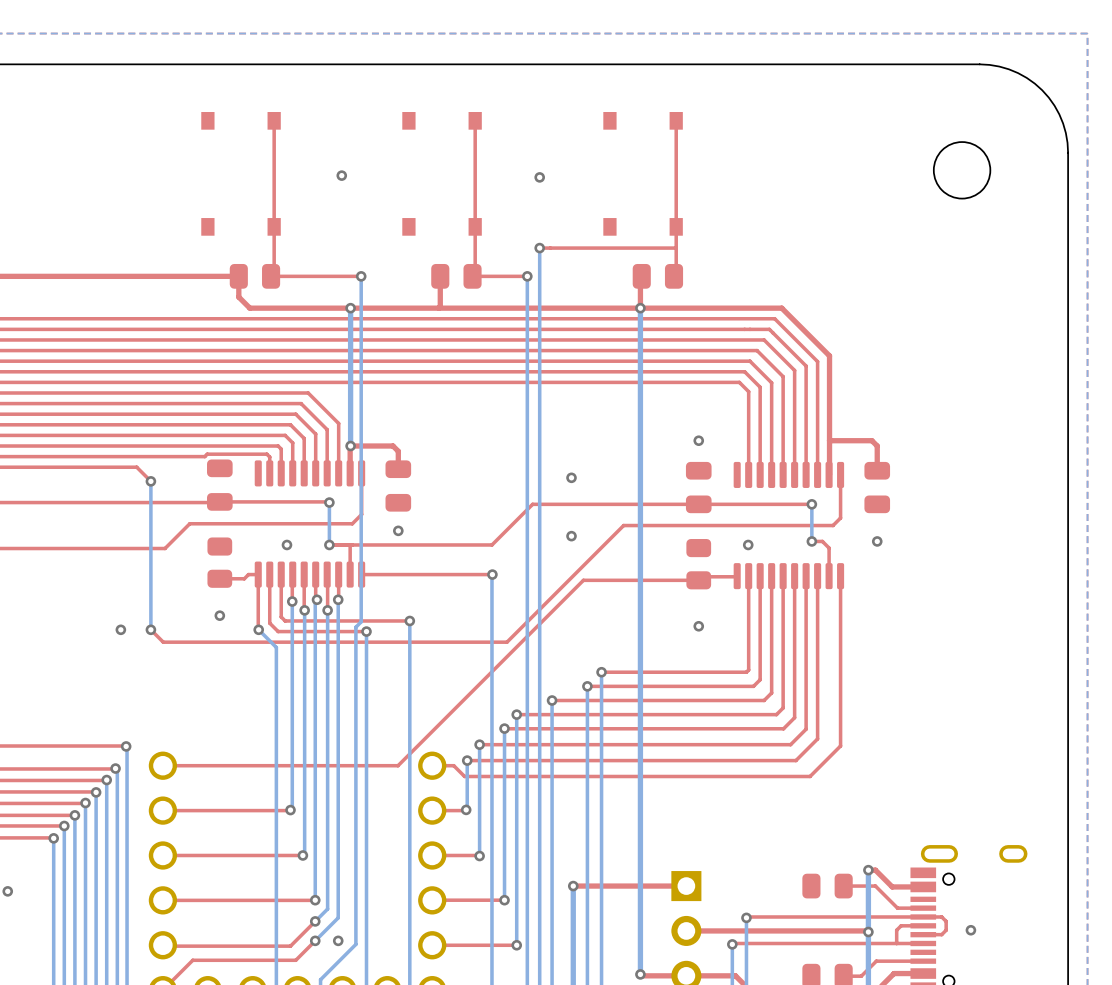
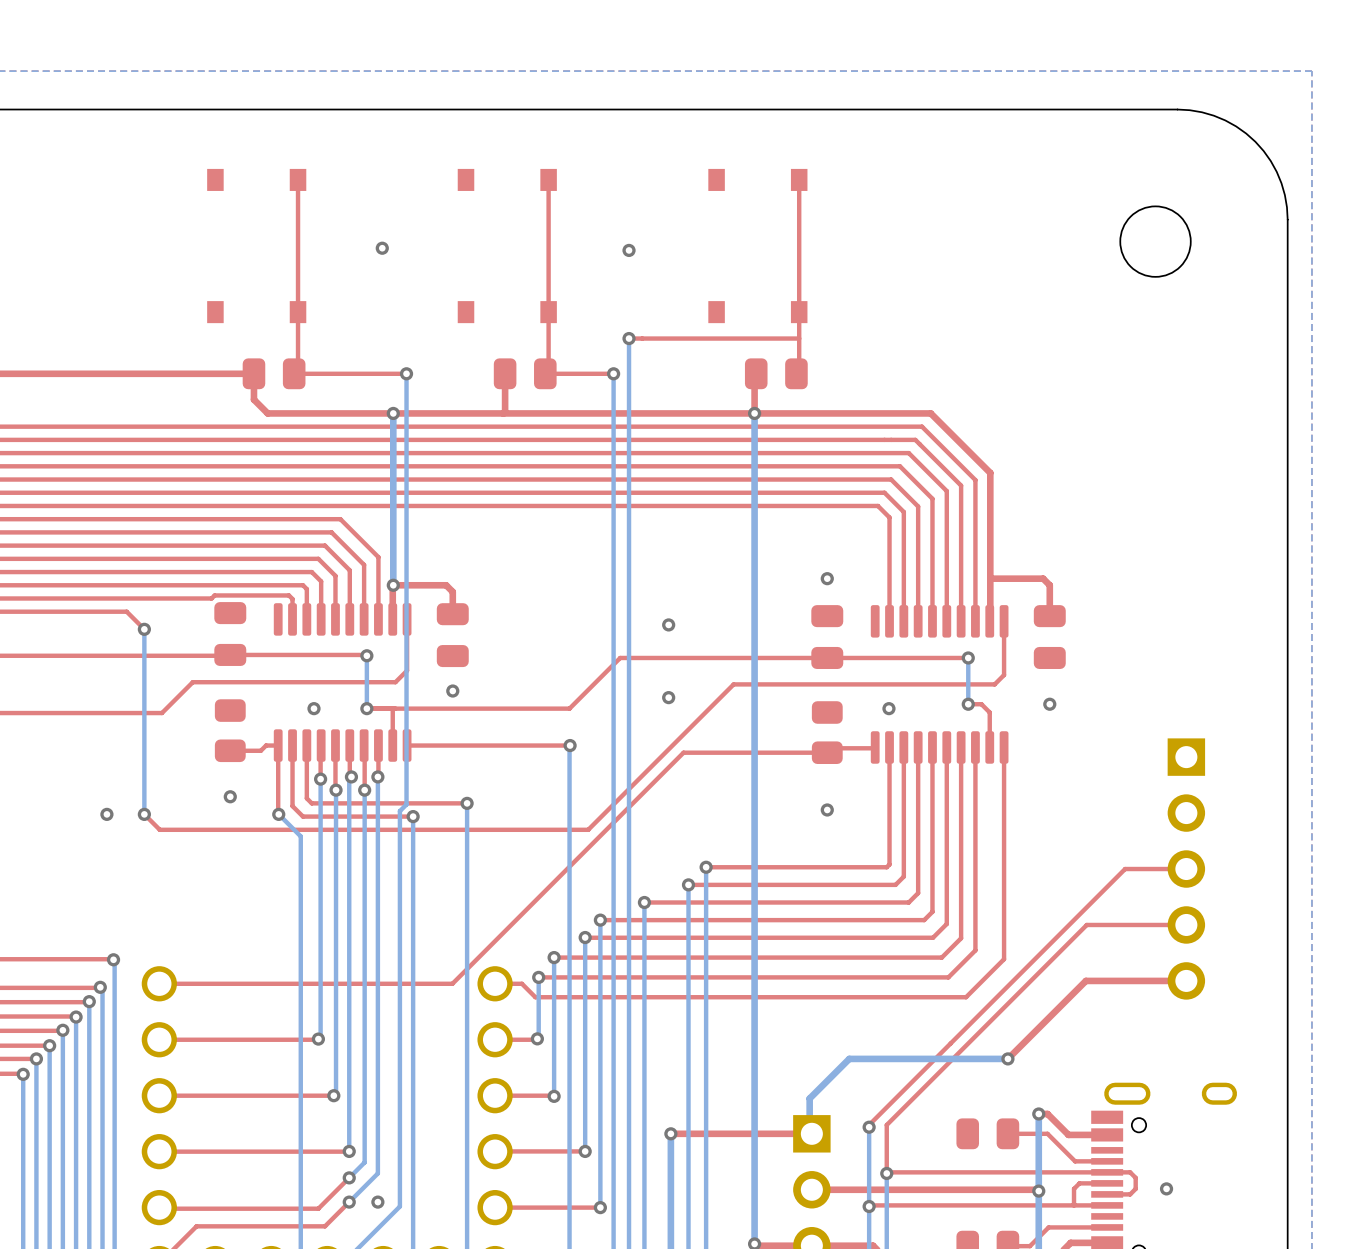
top track: none -> (1186, 869) (1125, 869) (869, 1125) (869, 1127)
part: none -> (1186, 869)
top track: none -> (1186, 924) (1086, 924) (886, 1125) (886, 1173)
top track: none -> (1186, 980) (1085, 980) (1007, 1058)
bottom track: none -> (1007, 1058) (849, 1058) (809, 1098) (809, 1131) (811, 1133)
via: none -> (1007, 1058)
bottom track: none -> (869, 1127) (869, 1206)
via: none -> (869, 1127)

